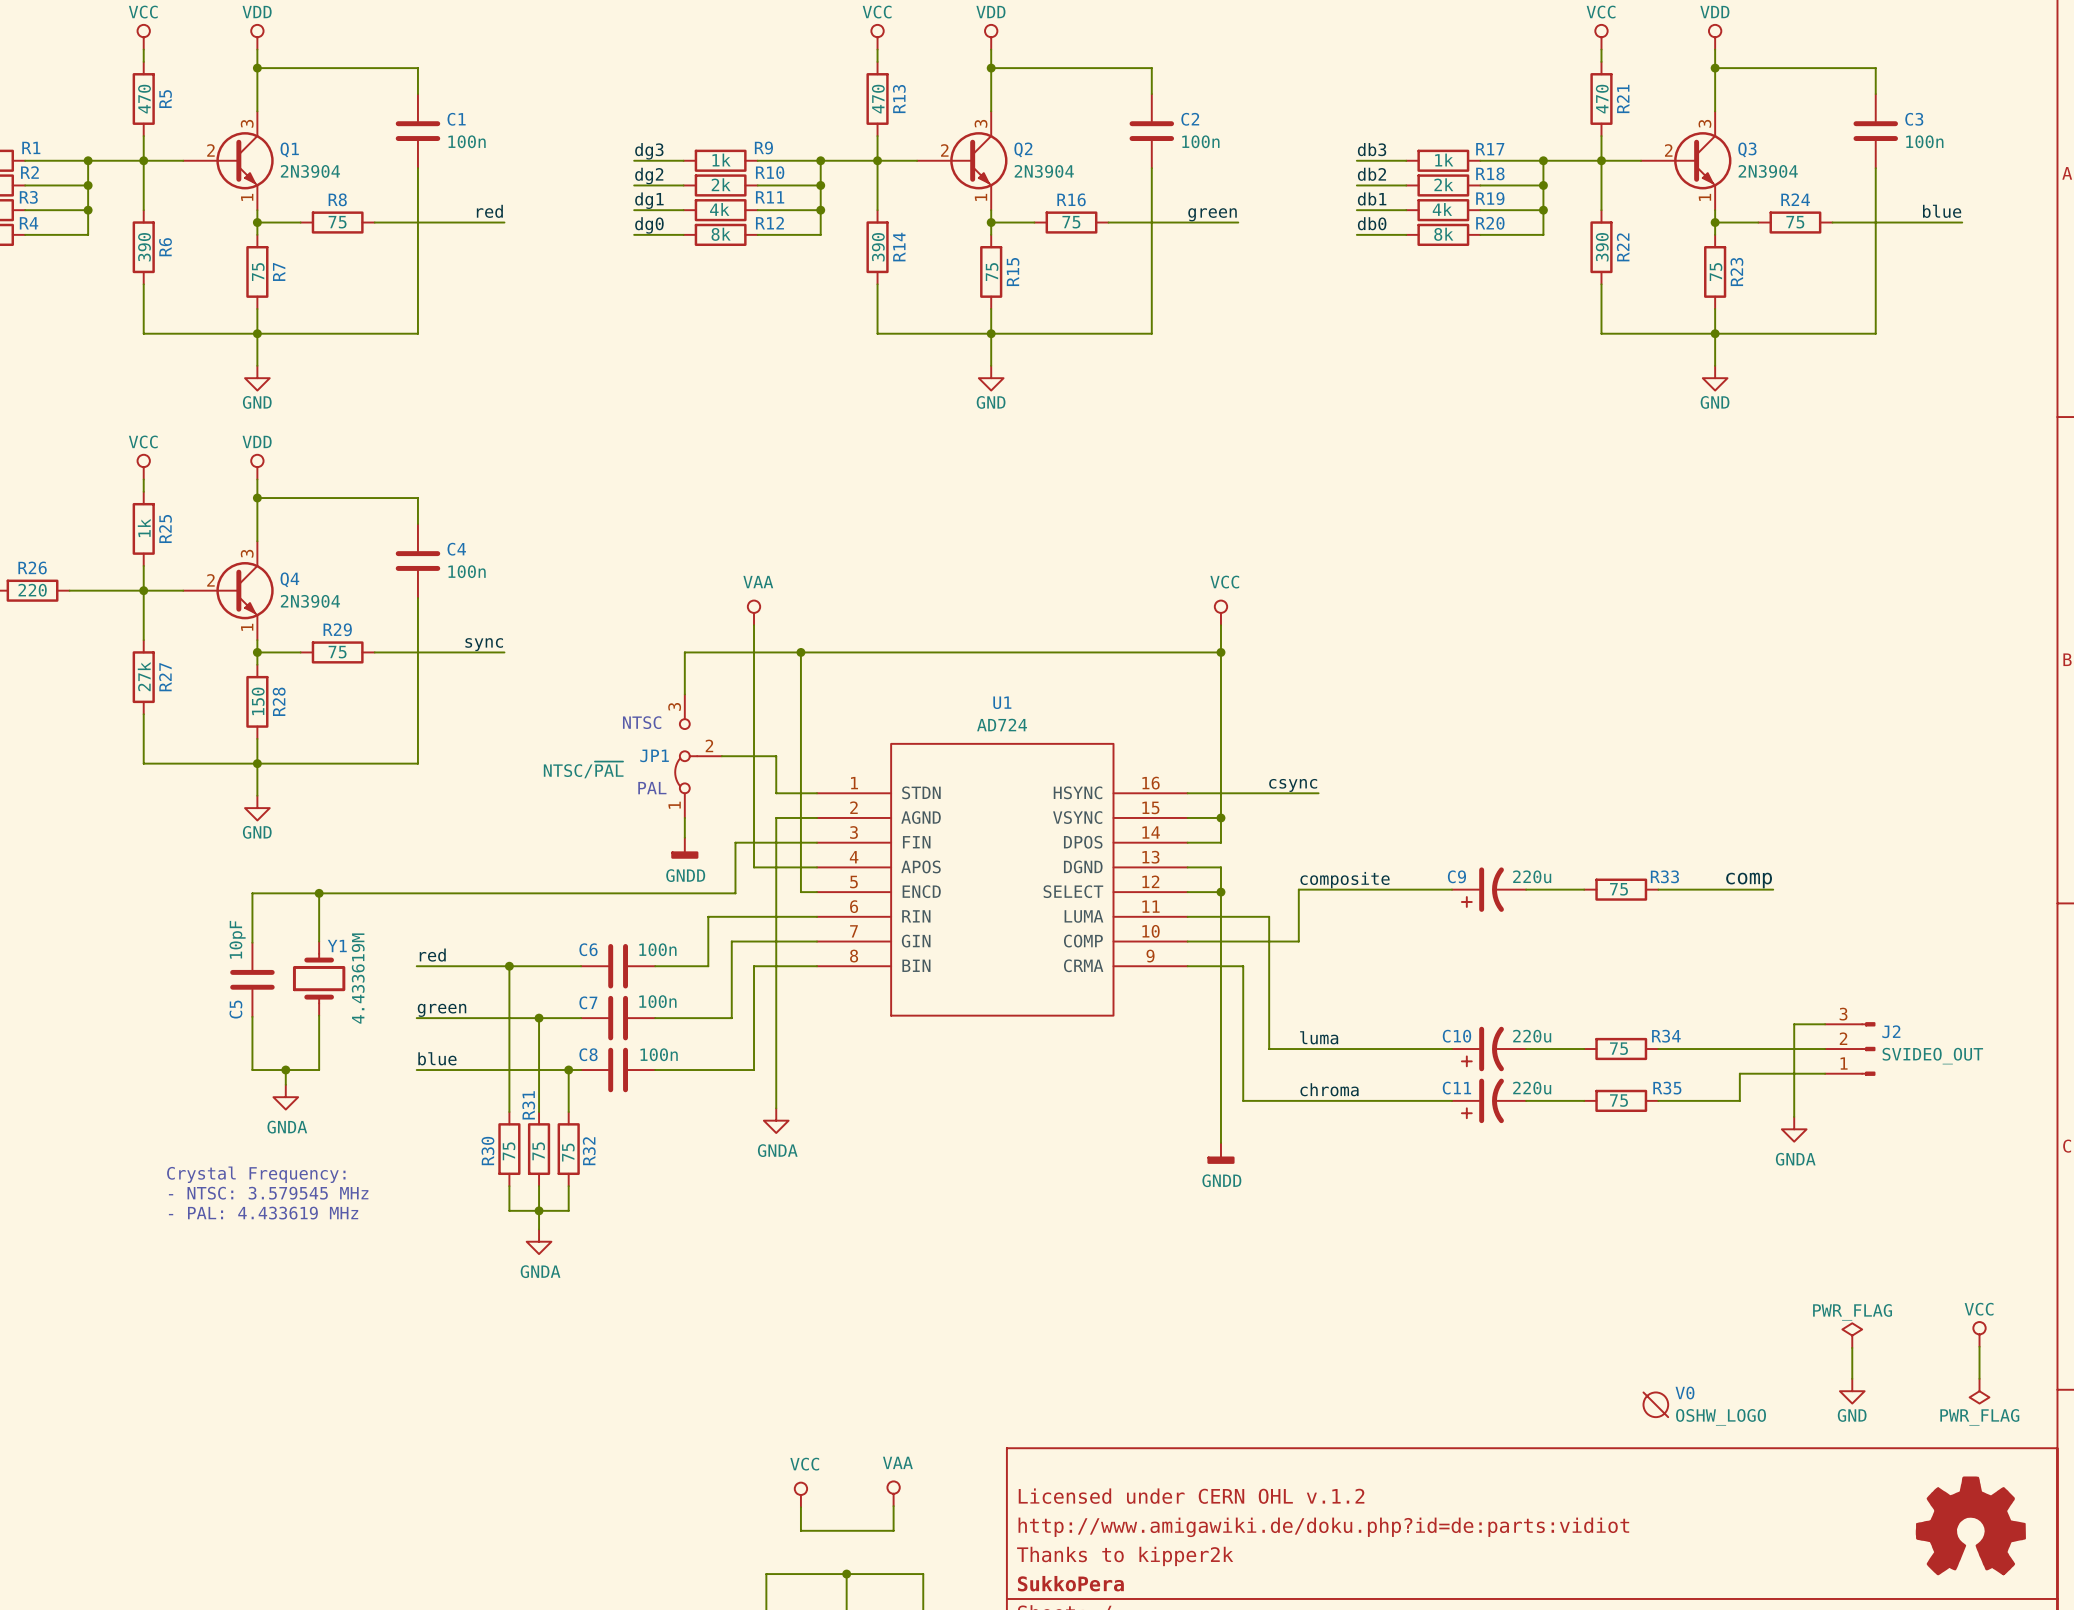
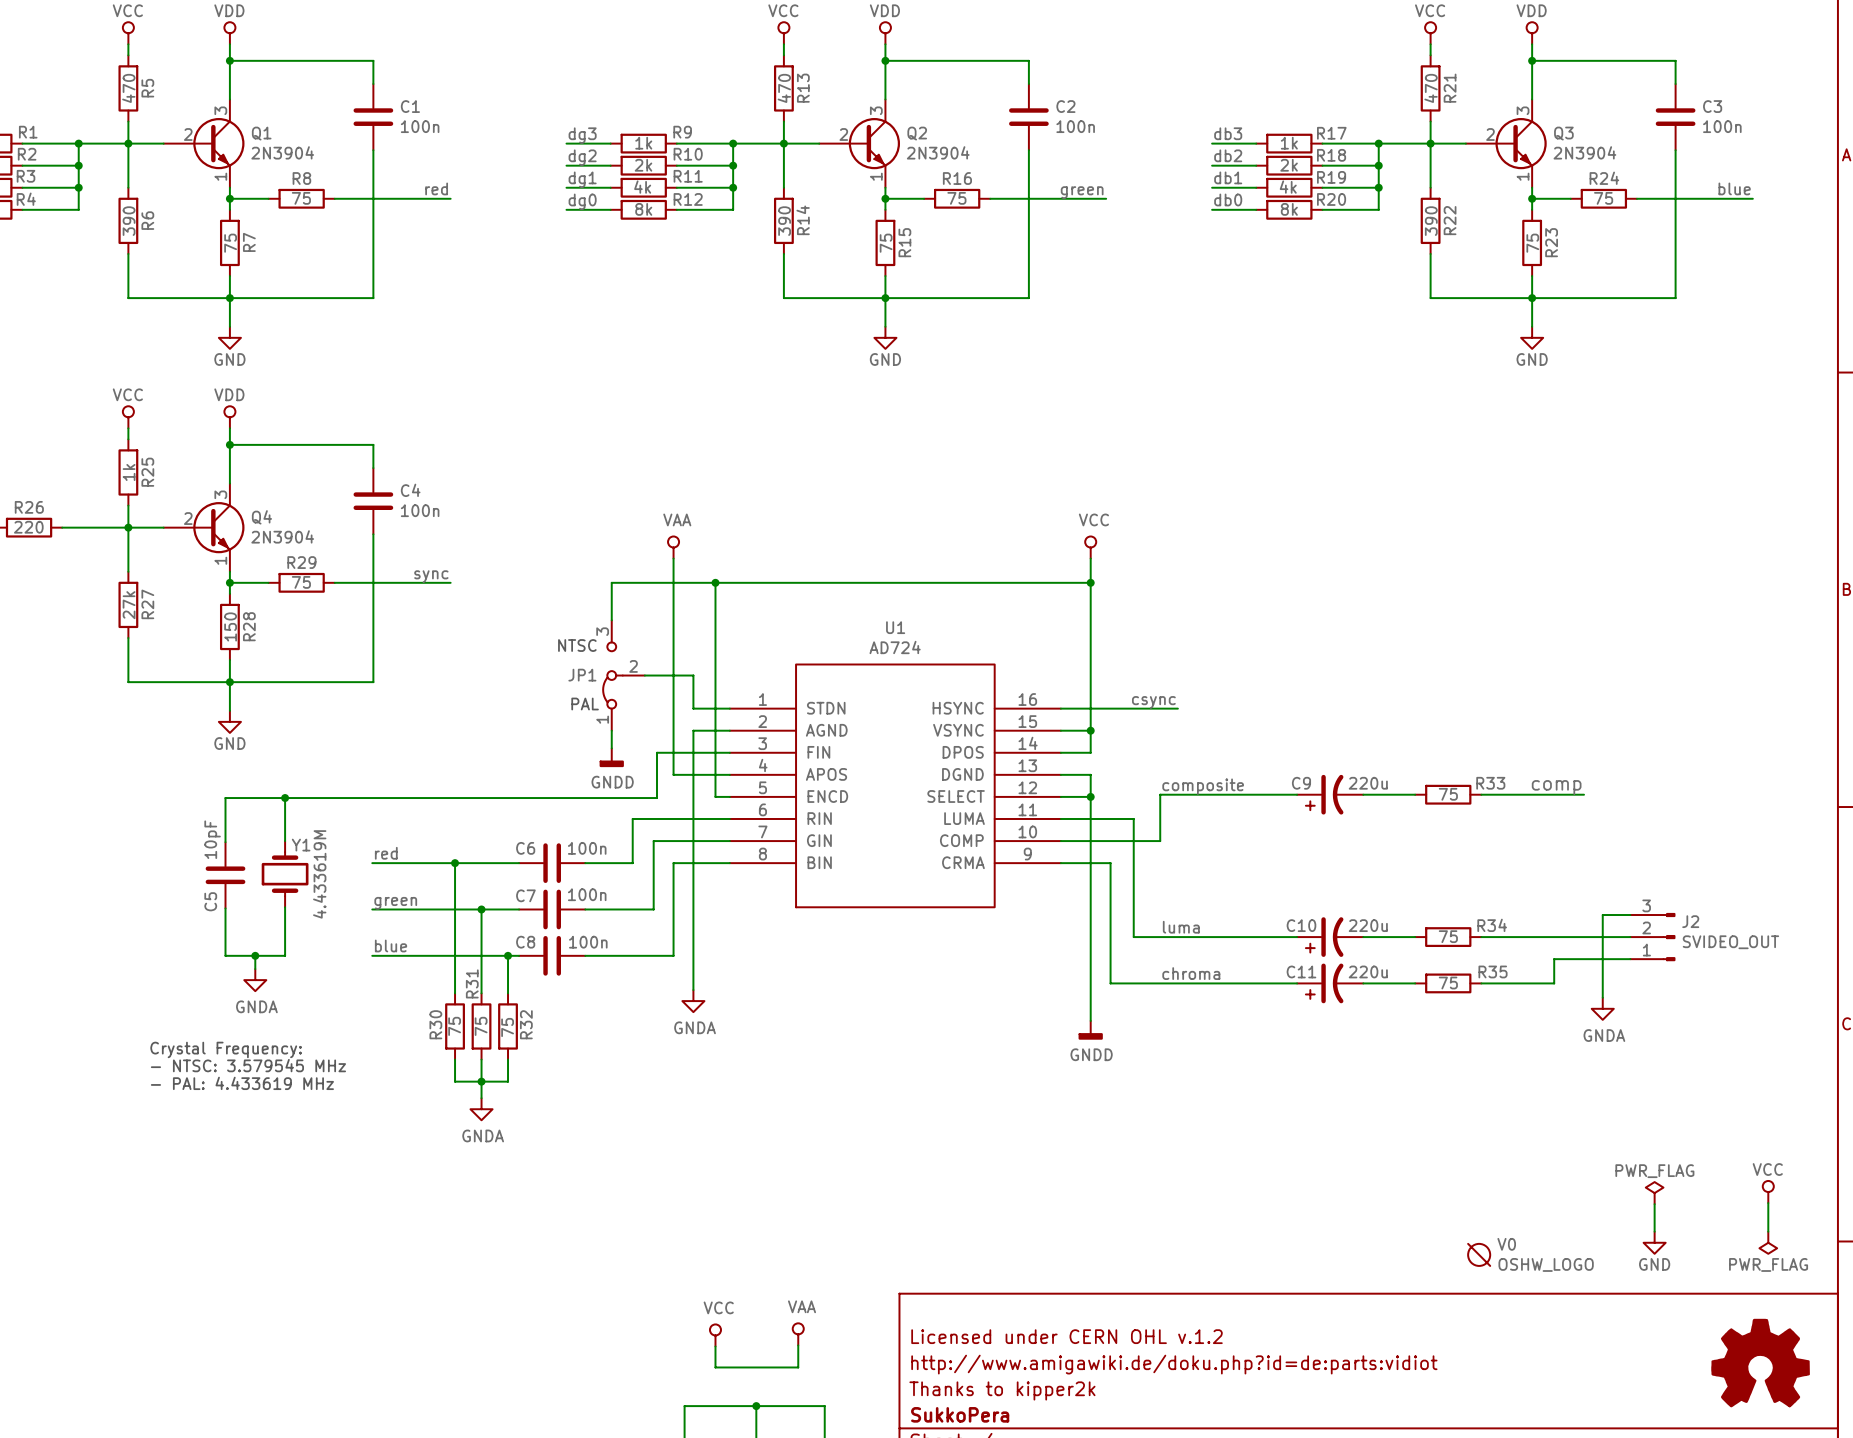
JP1 value: NTSC/~{PAL} (583, 769) -> none

